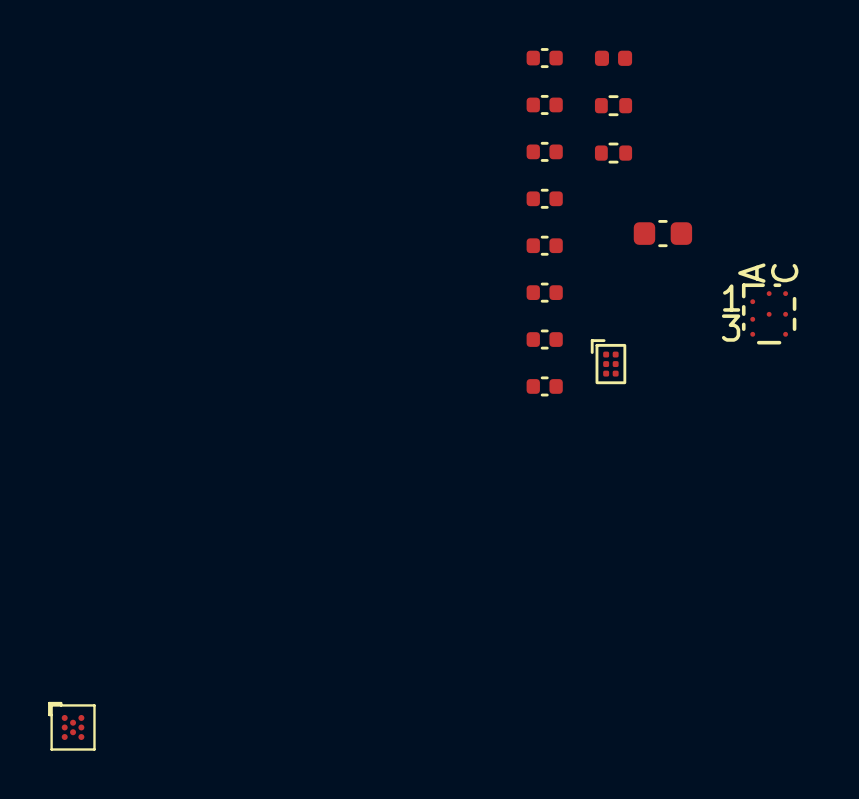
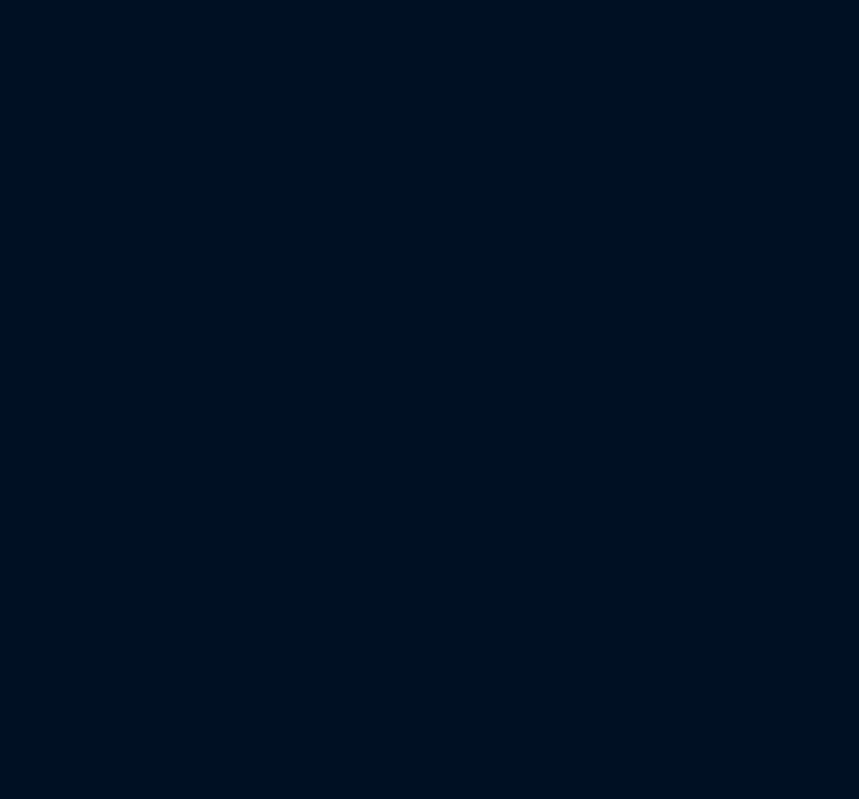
part: (544, 58) -> none
part: (613, 58) -> none
part: (544, 104) -> none
part: (613, 105) -> none
part: (544, 151) -> none
part: (613, 153) -> none
part: (544, 198) -> none
part: (662, 233) -> none
part: (544, 245) -> none
part: (544, 292) -> none
part: (769, 313) -> none
part: (544, 339) -> none
part: (608, 361) -> none
part: (544, 386) -> none
part: (71, 726) -> none

